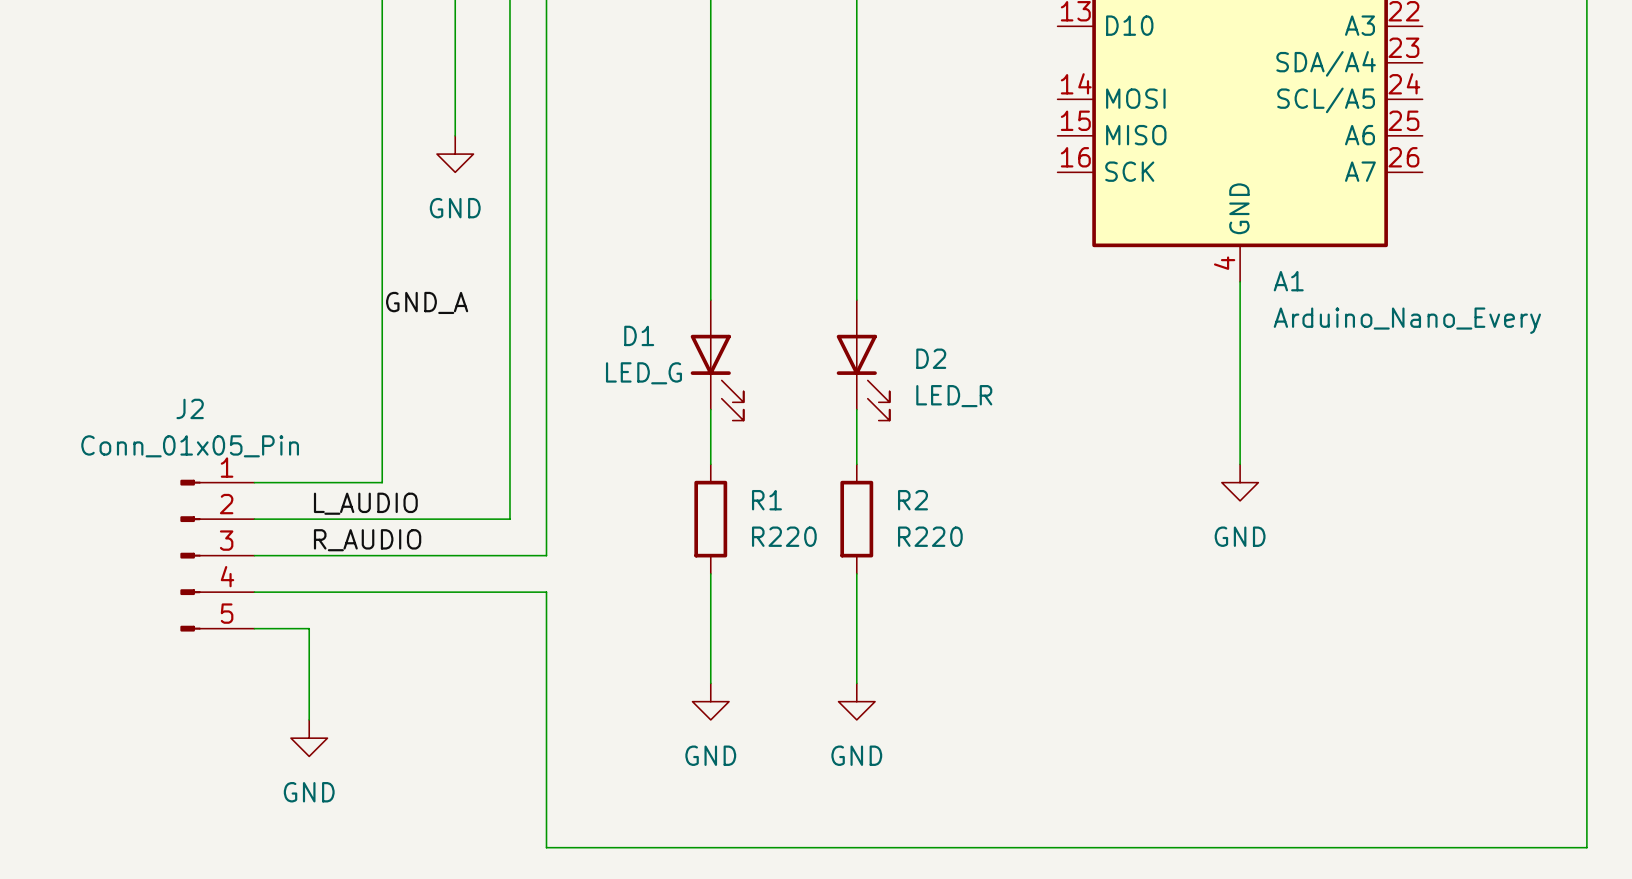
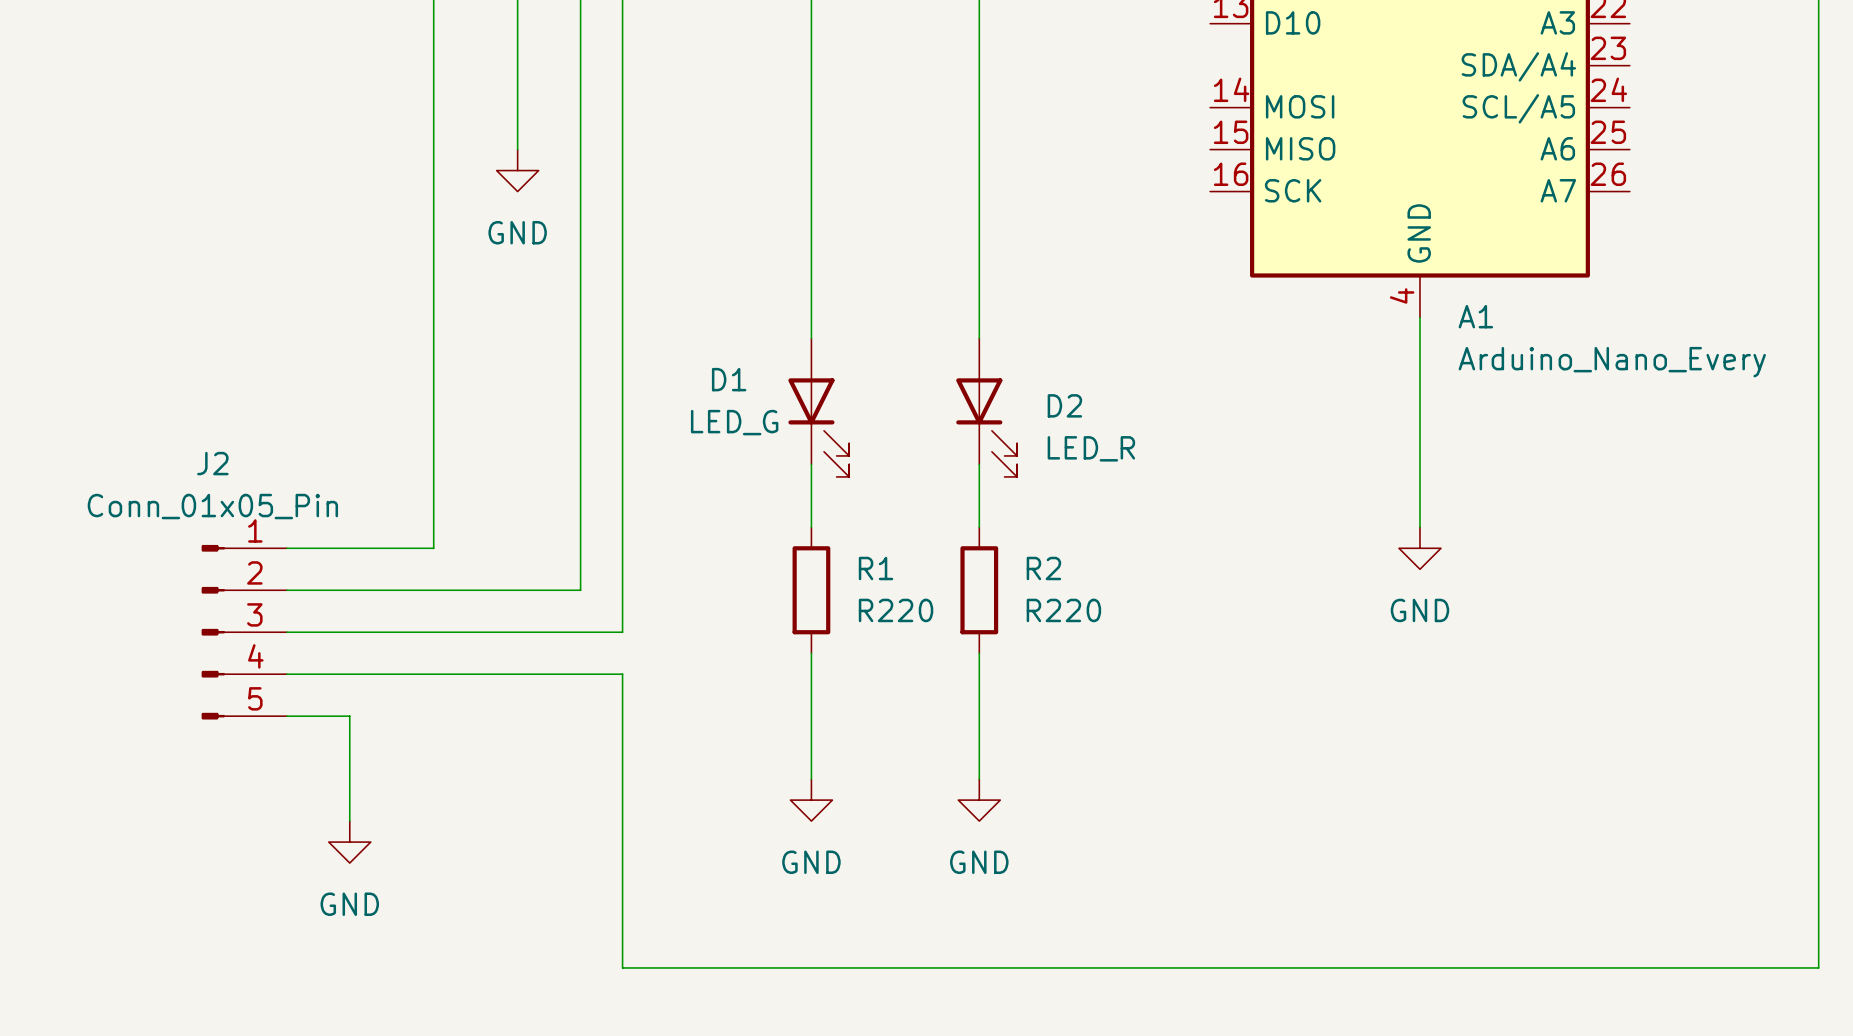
label: GND_A (427, 302) -> none
label: L_AUDIO (365, 503) -> none
label: R_AUDIO (367, 540) -> none

